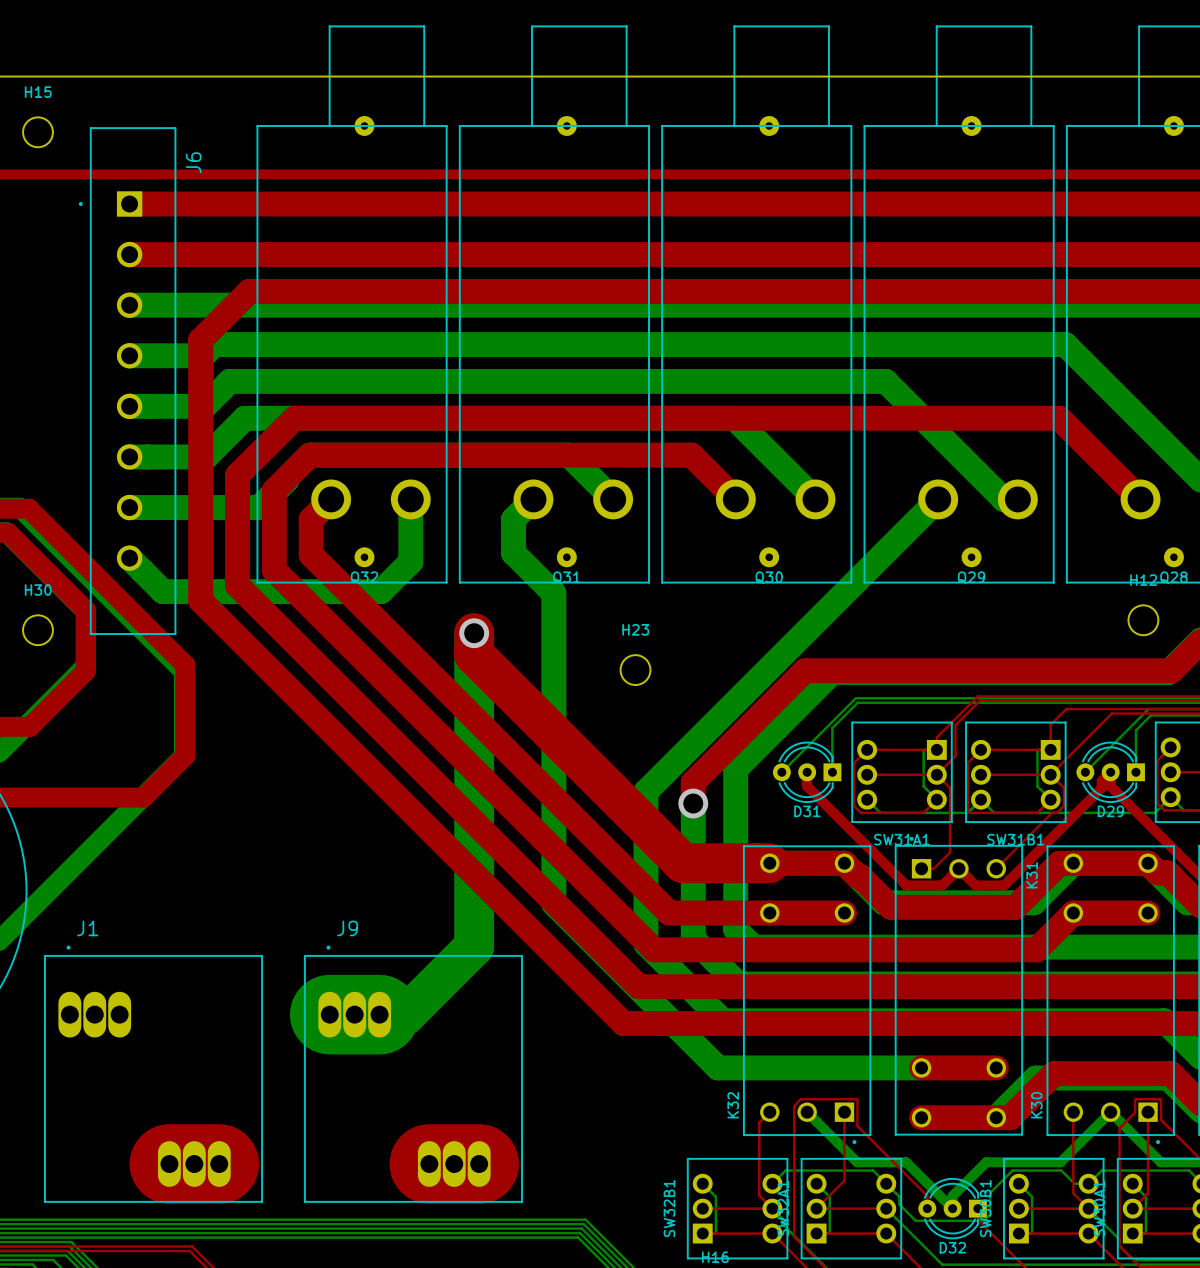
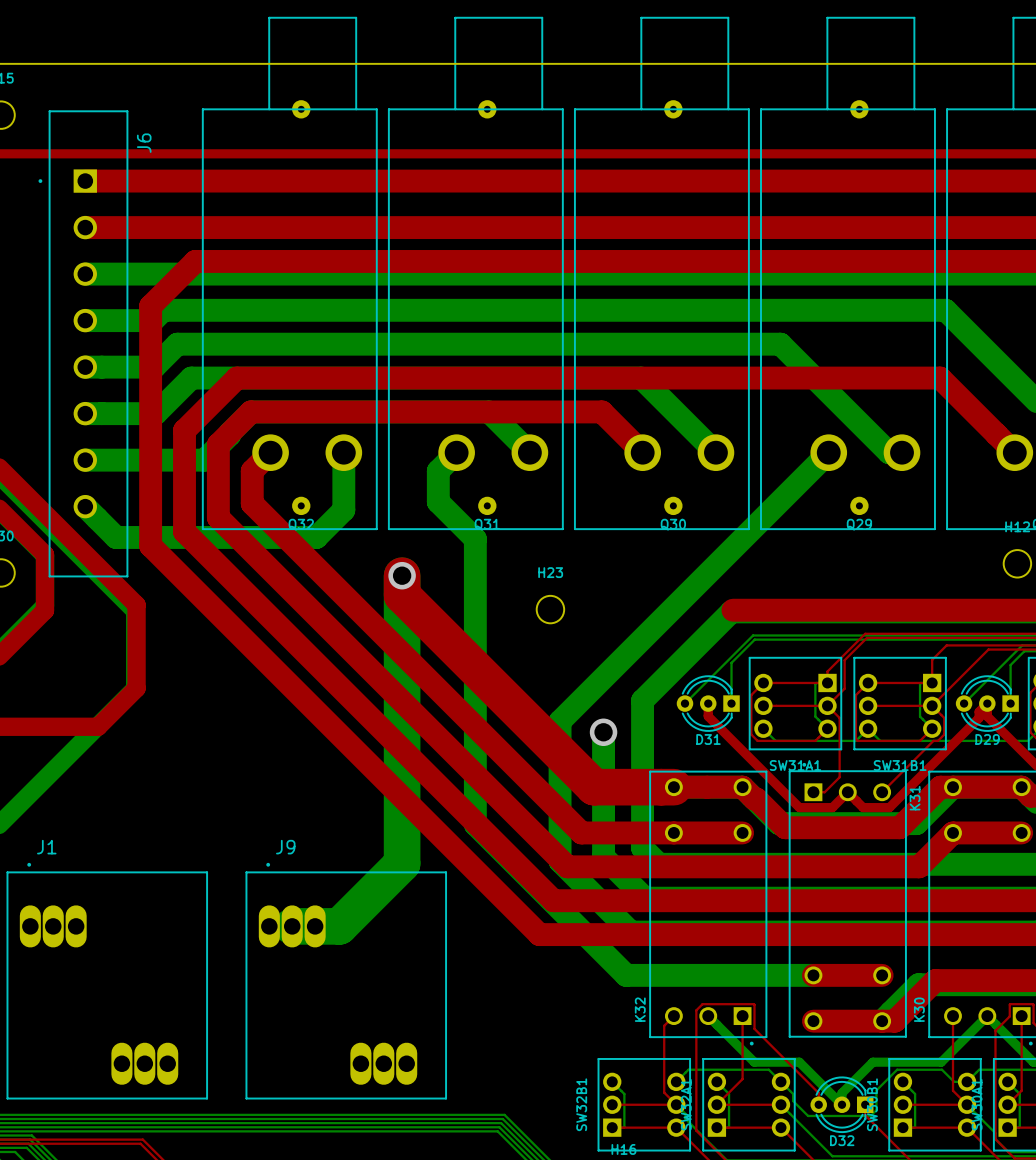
top track: (834, 670) (804, 670) (693, 782) (693, 803) -> none
bottom track: (329, 1014) (379, 1014) -> none
top track: (169, 1164) (219, 1164) -> none
top track: (429, 1164) (479, 1164) -> none

